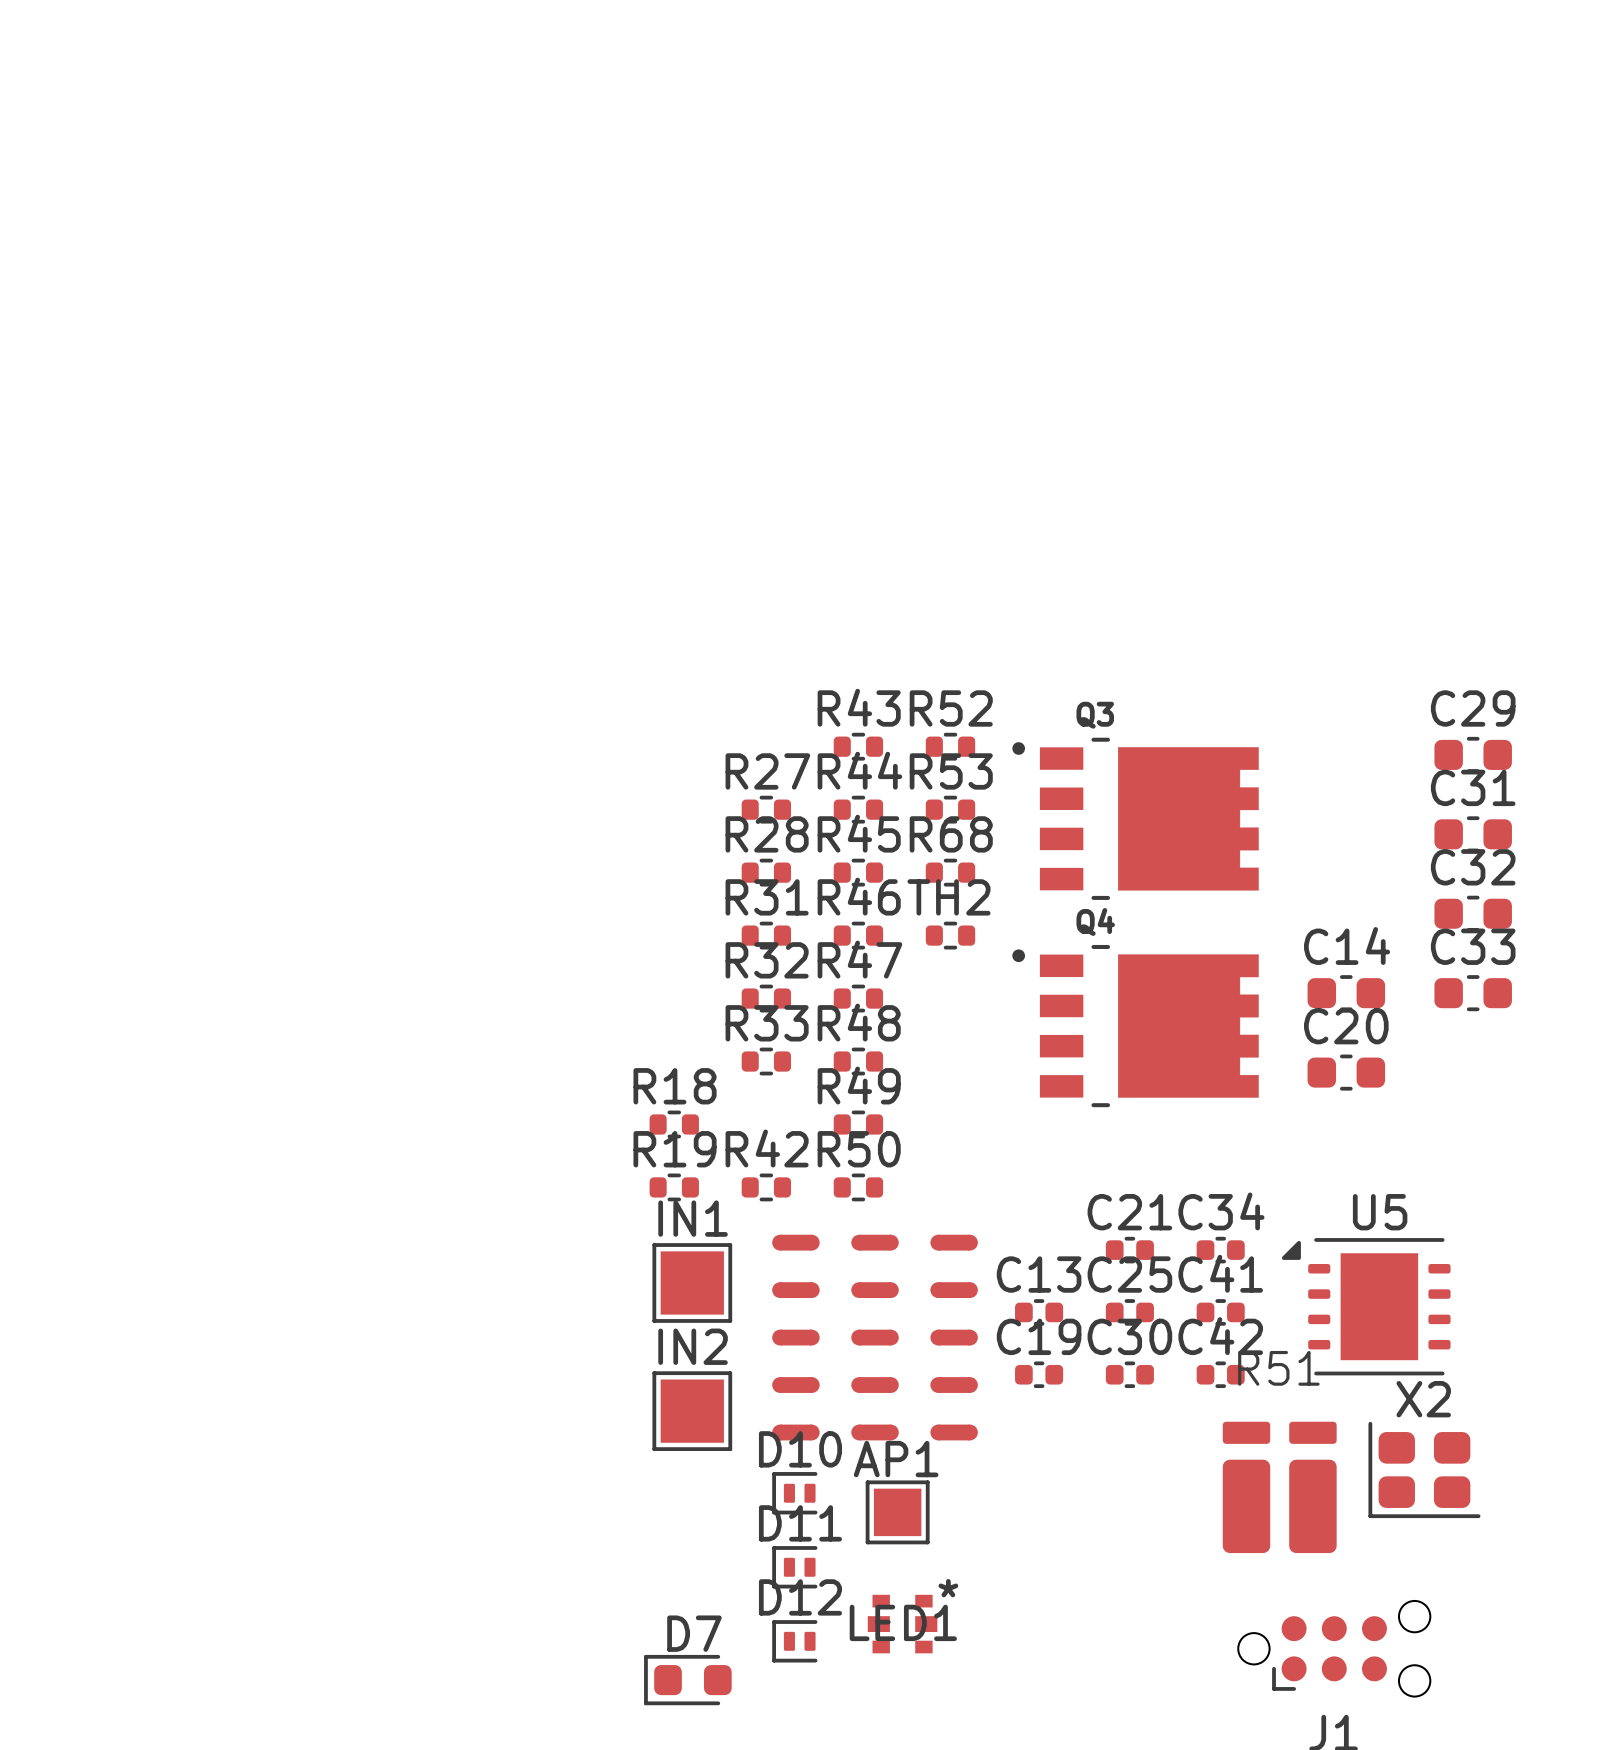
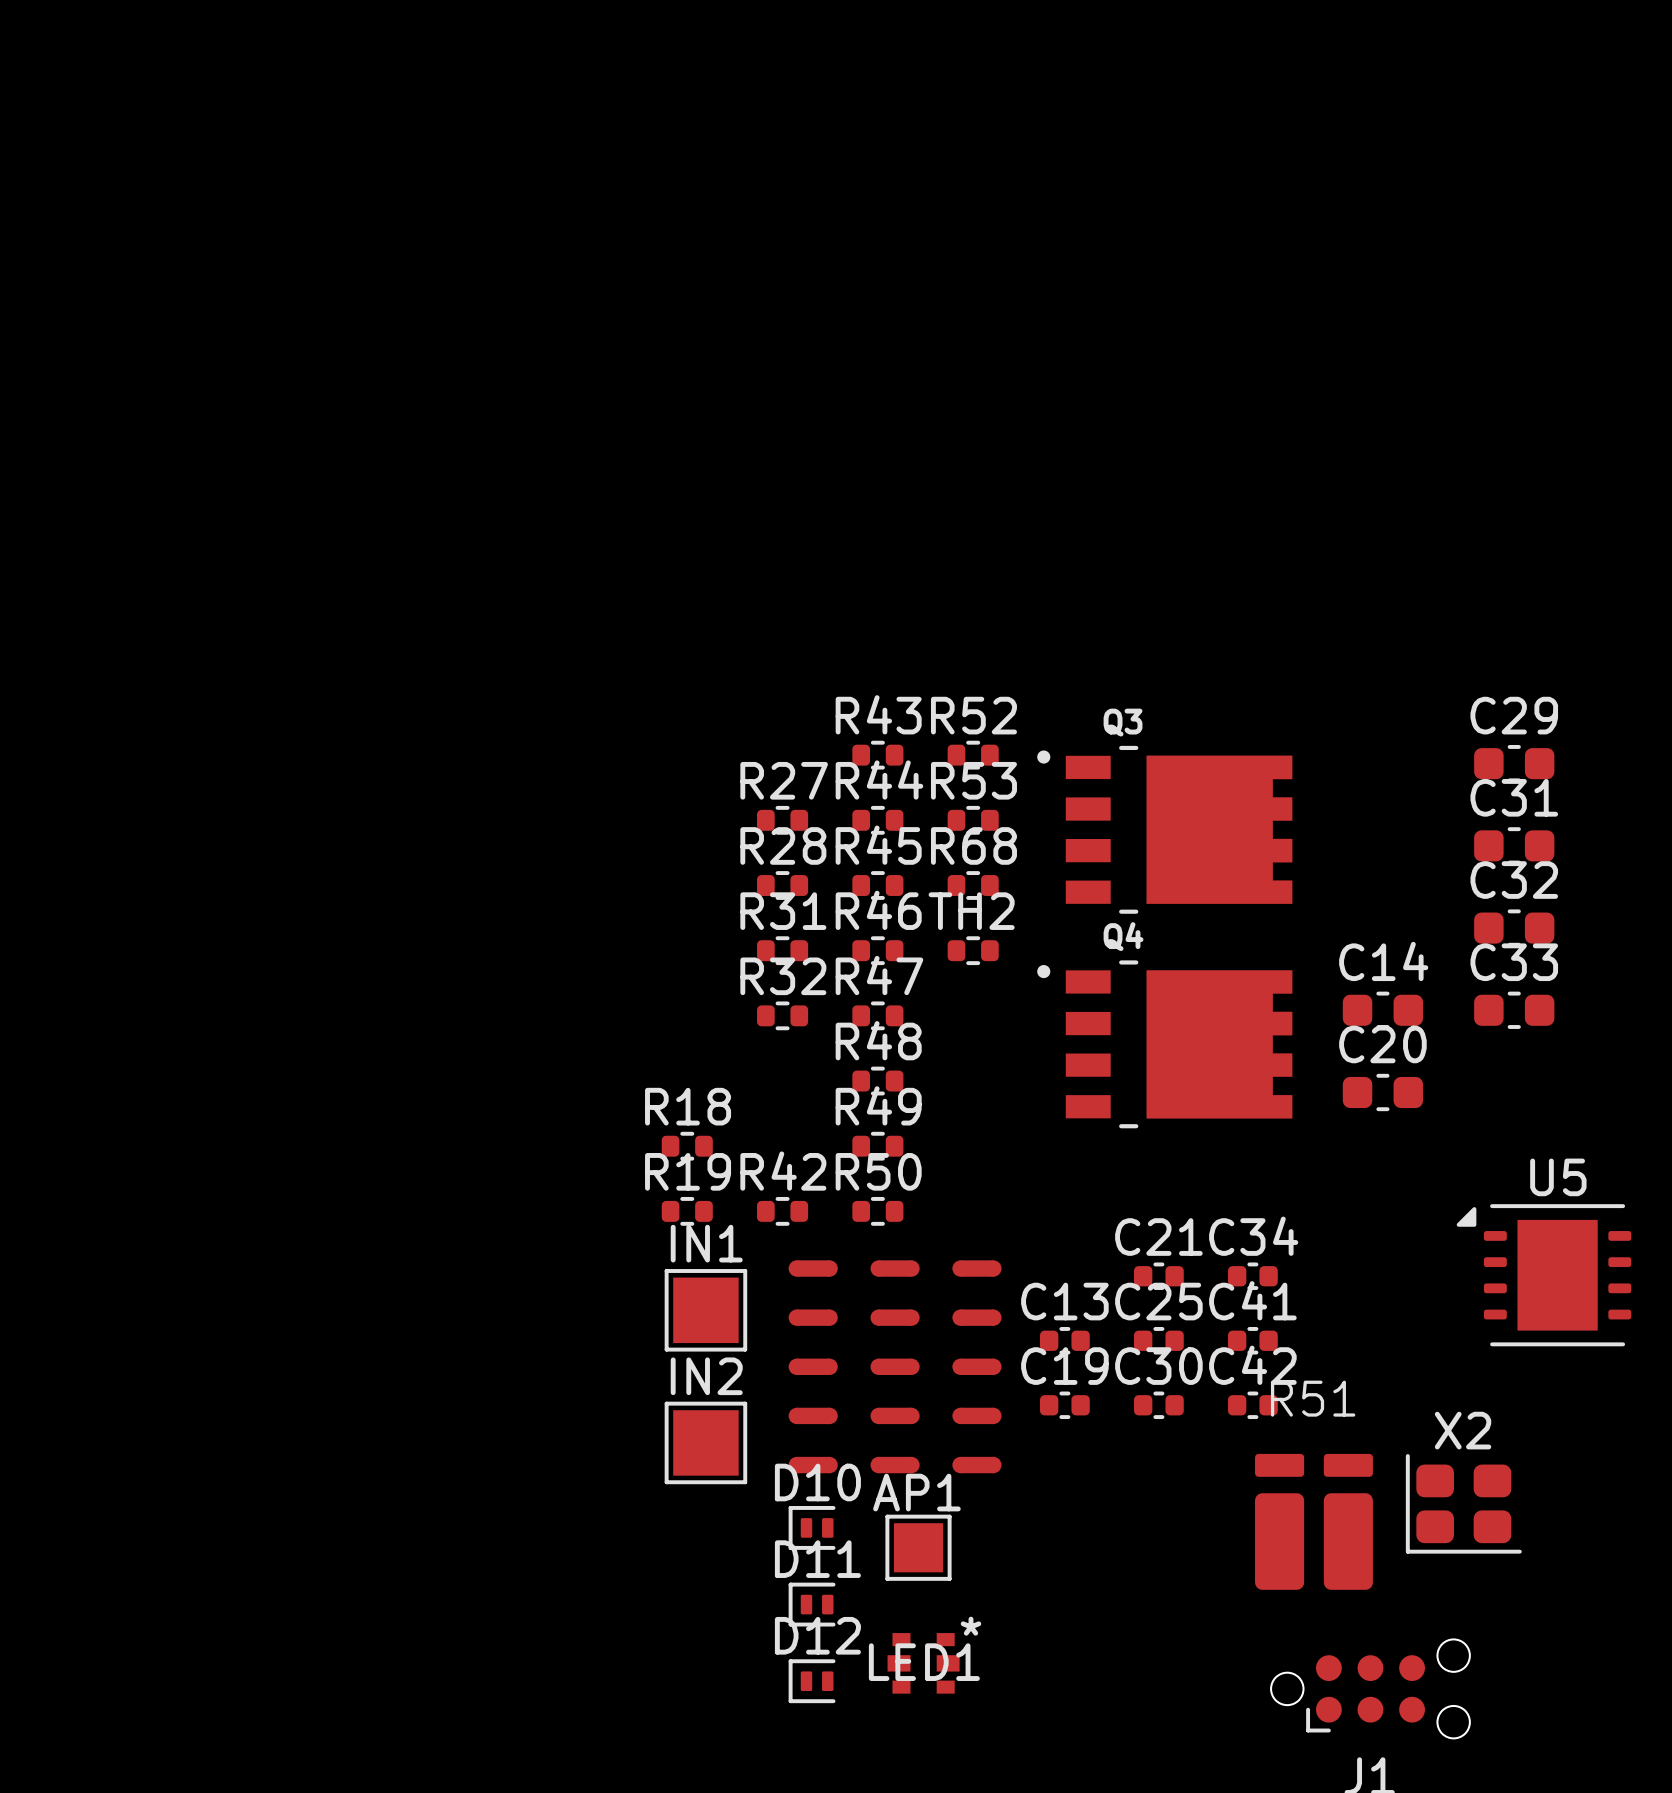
R33: (766, 1061) -> none
U5 position: (1366, 1306) -> (1543, 1275)
D7: (687, 1680) -> none

